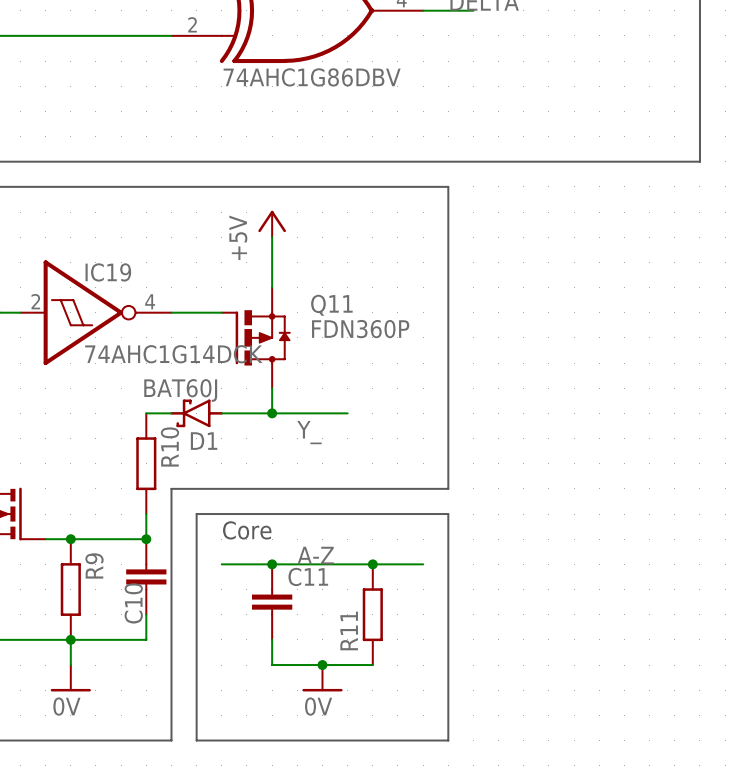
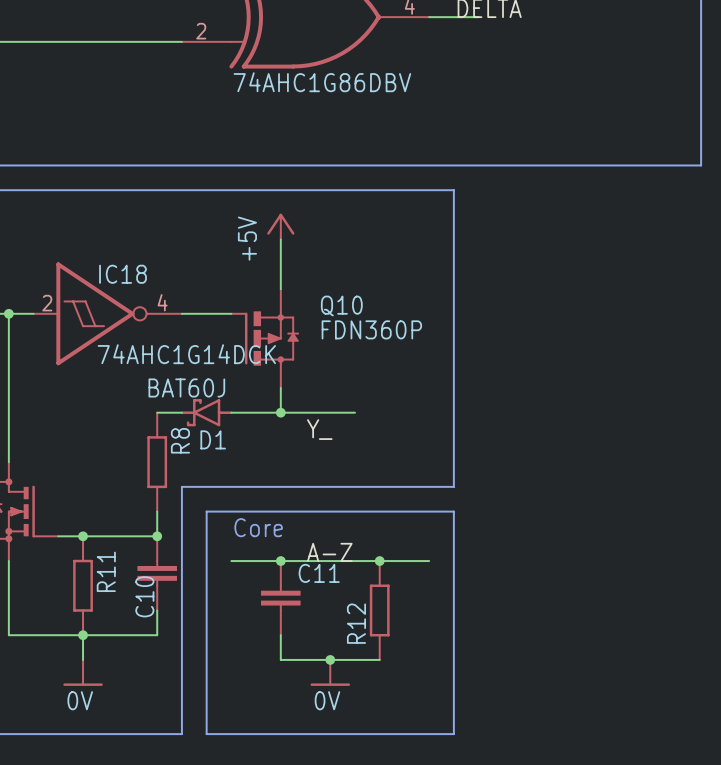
IC19 name: IC19 (108, 272) -> IC18 (123, 274)
Q11 name: Q11 (331, 305) -> Q10 (341, 305)
R10 name: R10 (169, 446) -> R8 (180, 440)
R9 name: R9 (94, 565) -> R11 (106, 571)
R11 name: R11 (349, 630) -> R12 (356, 623)

